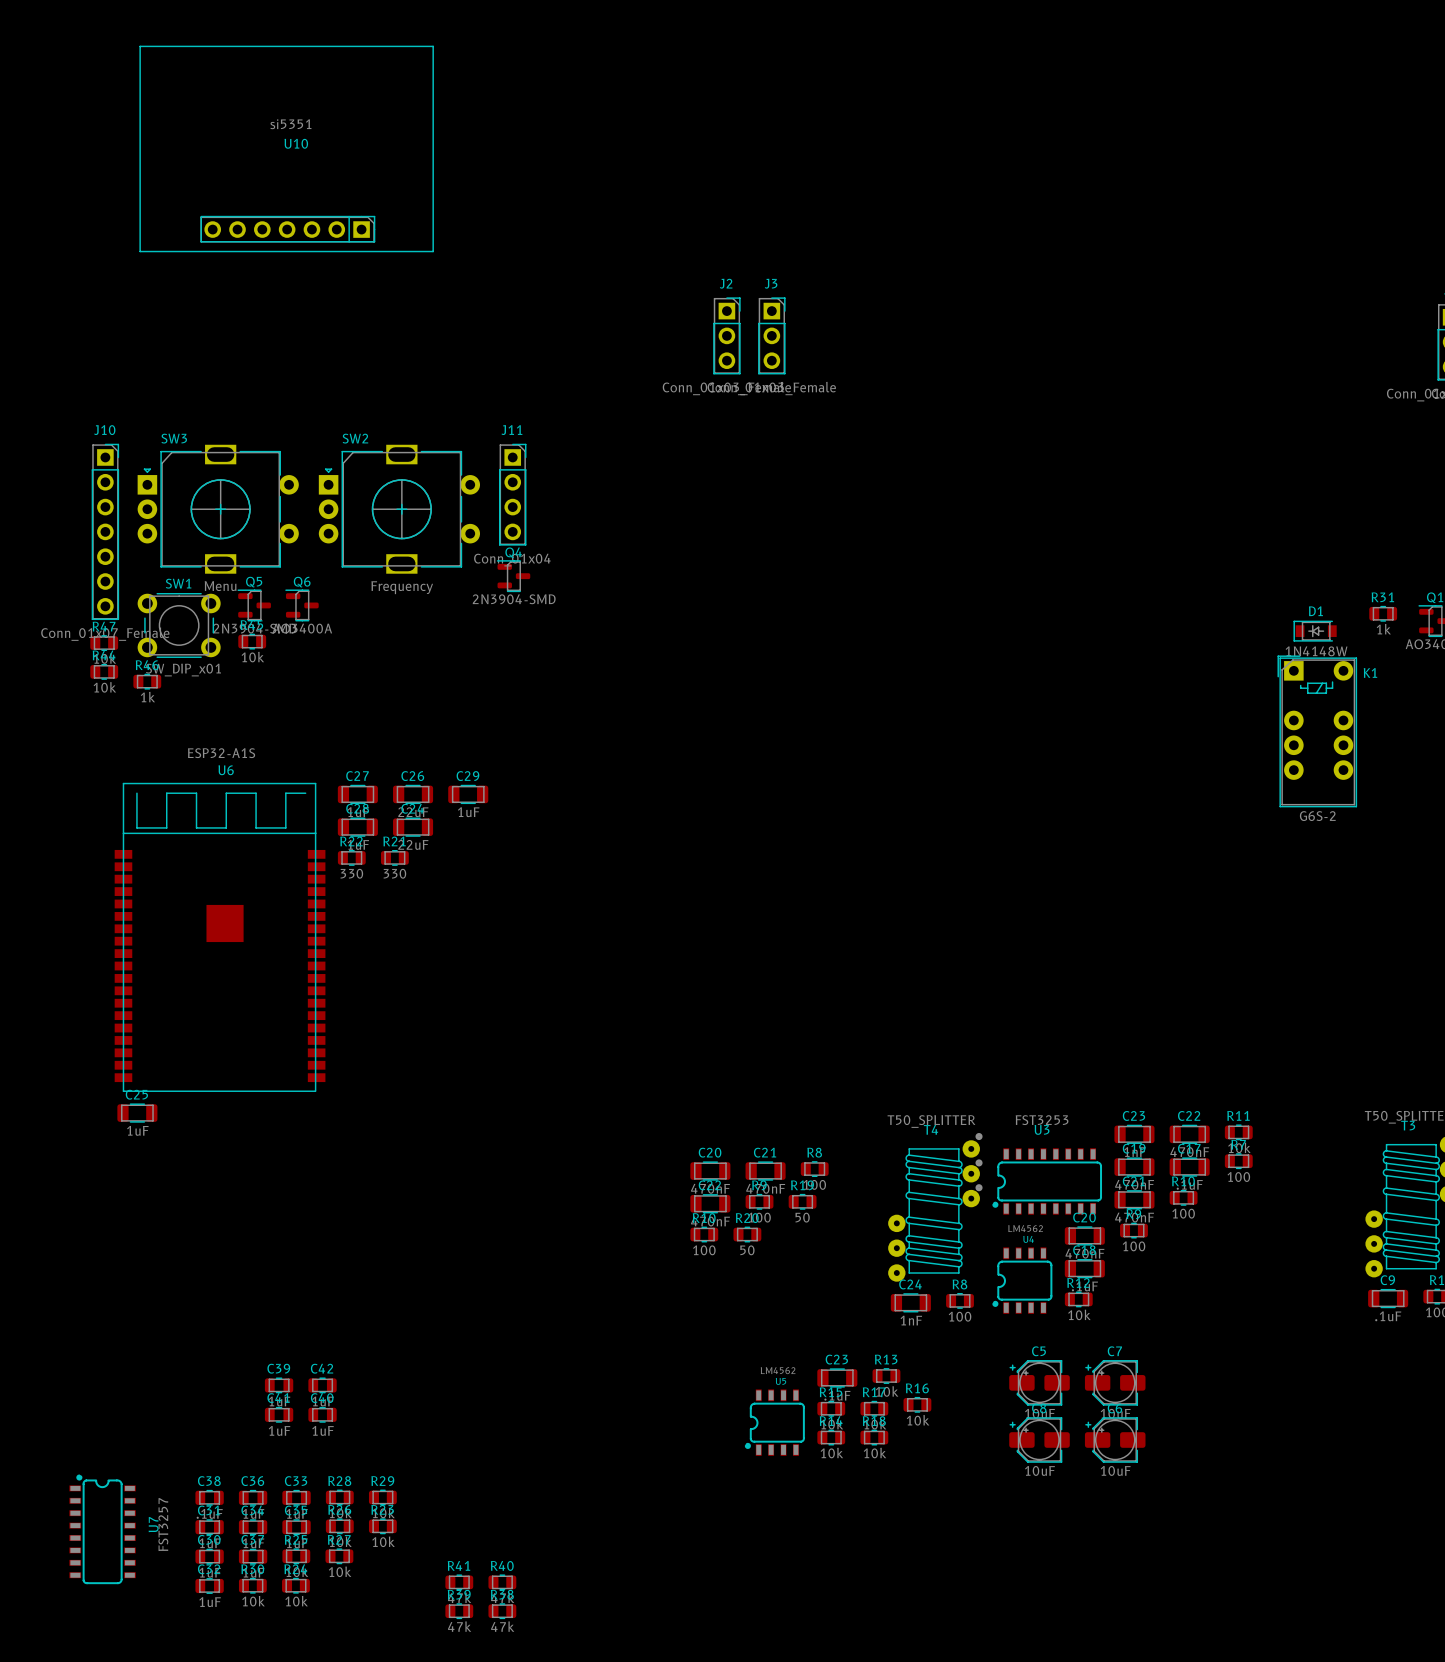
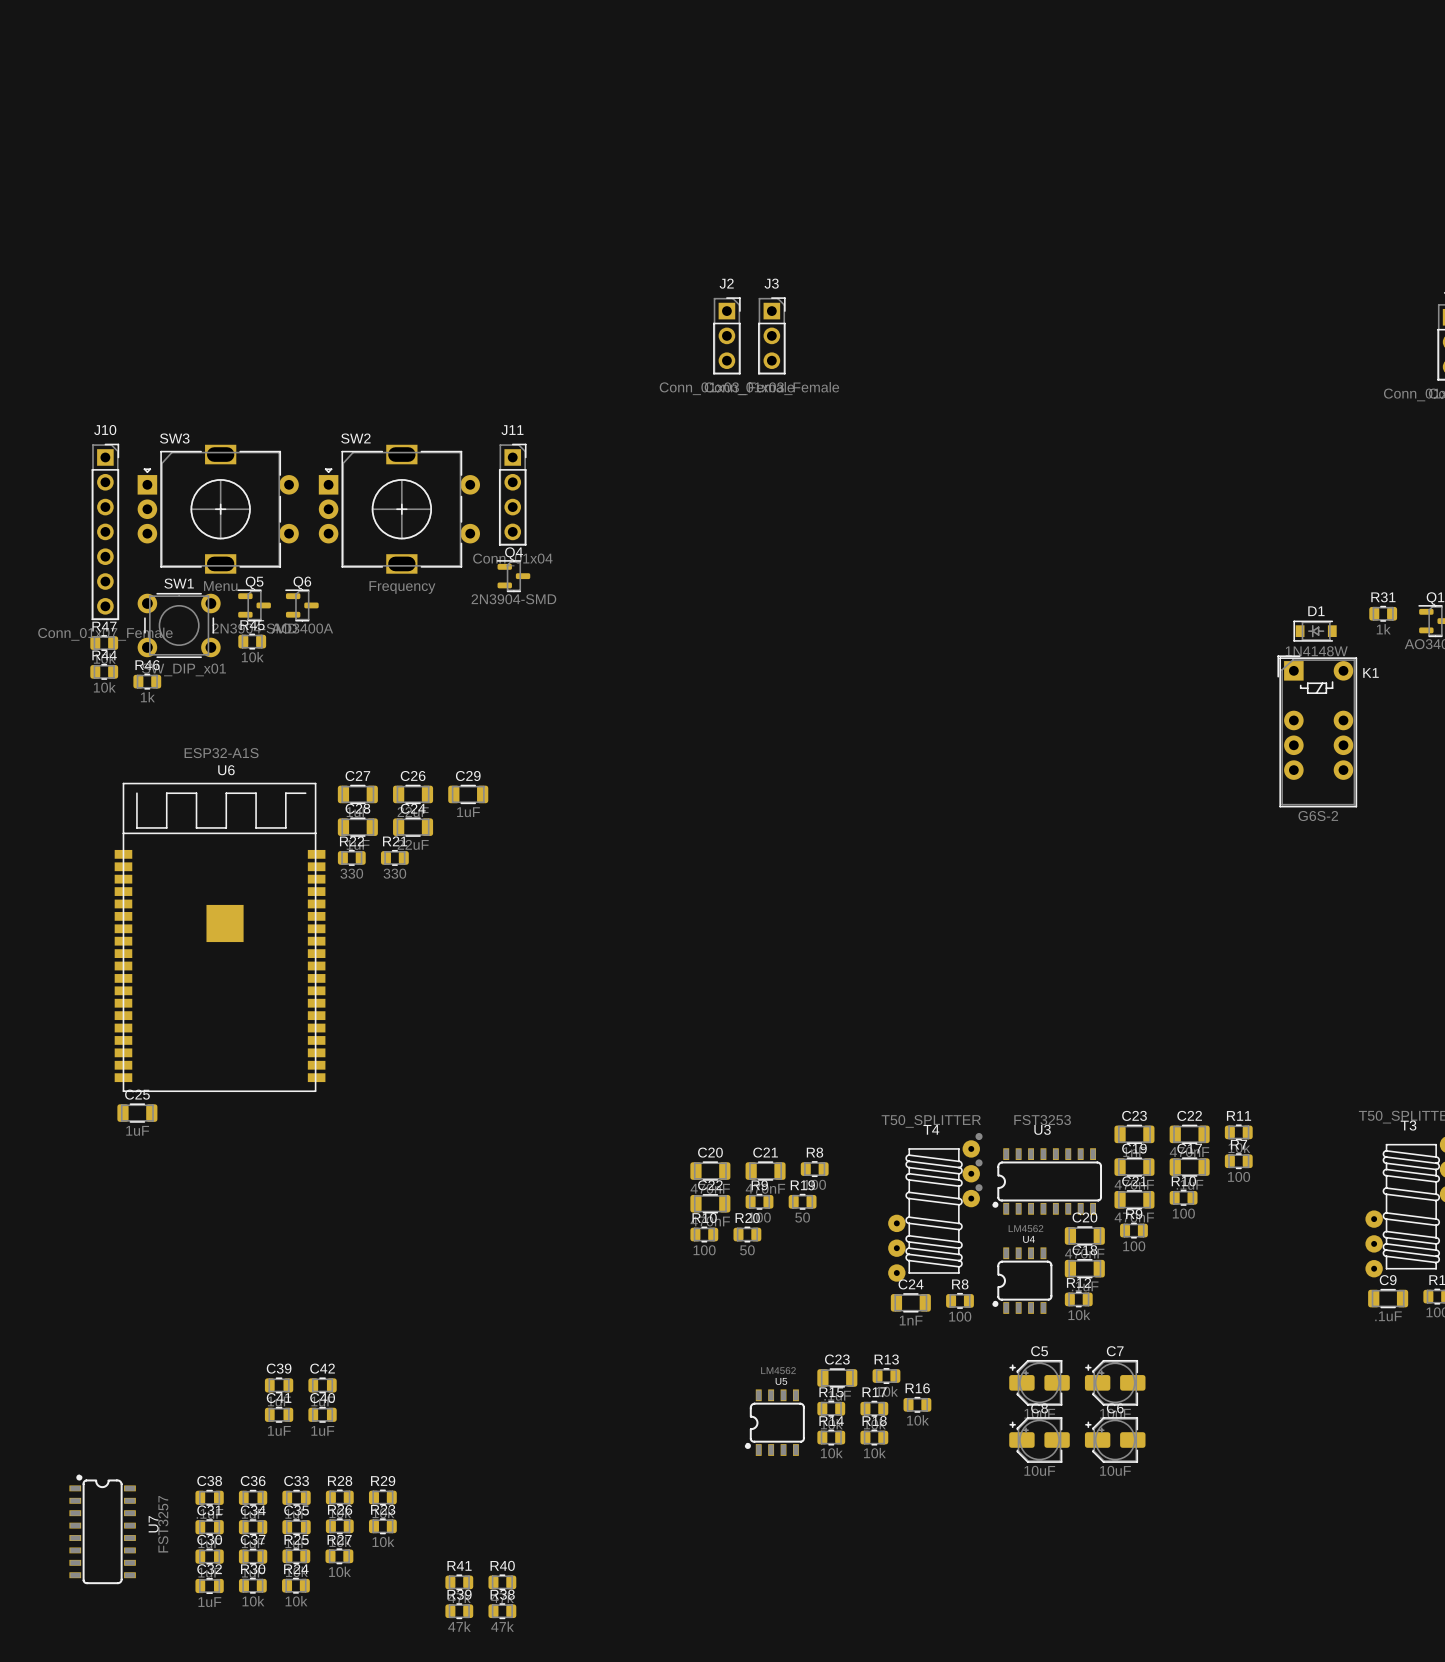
U10: si5351 (286, 148) -> none

